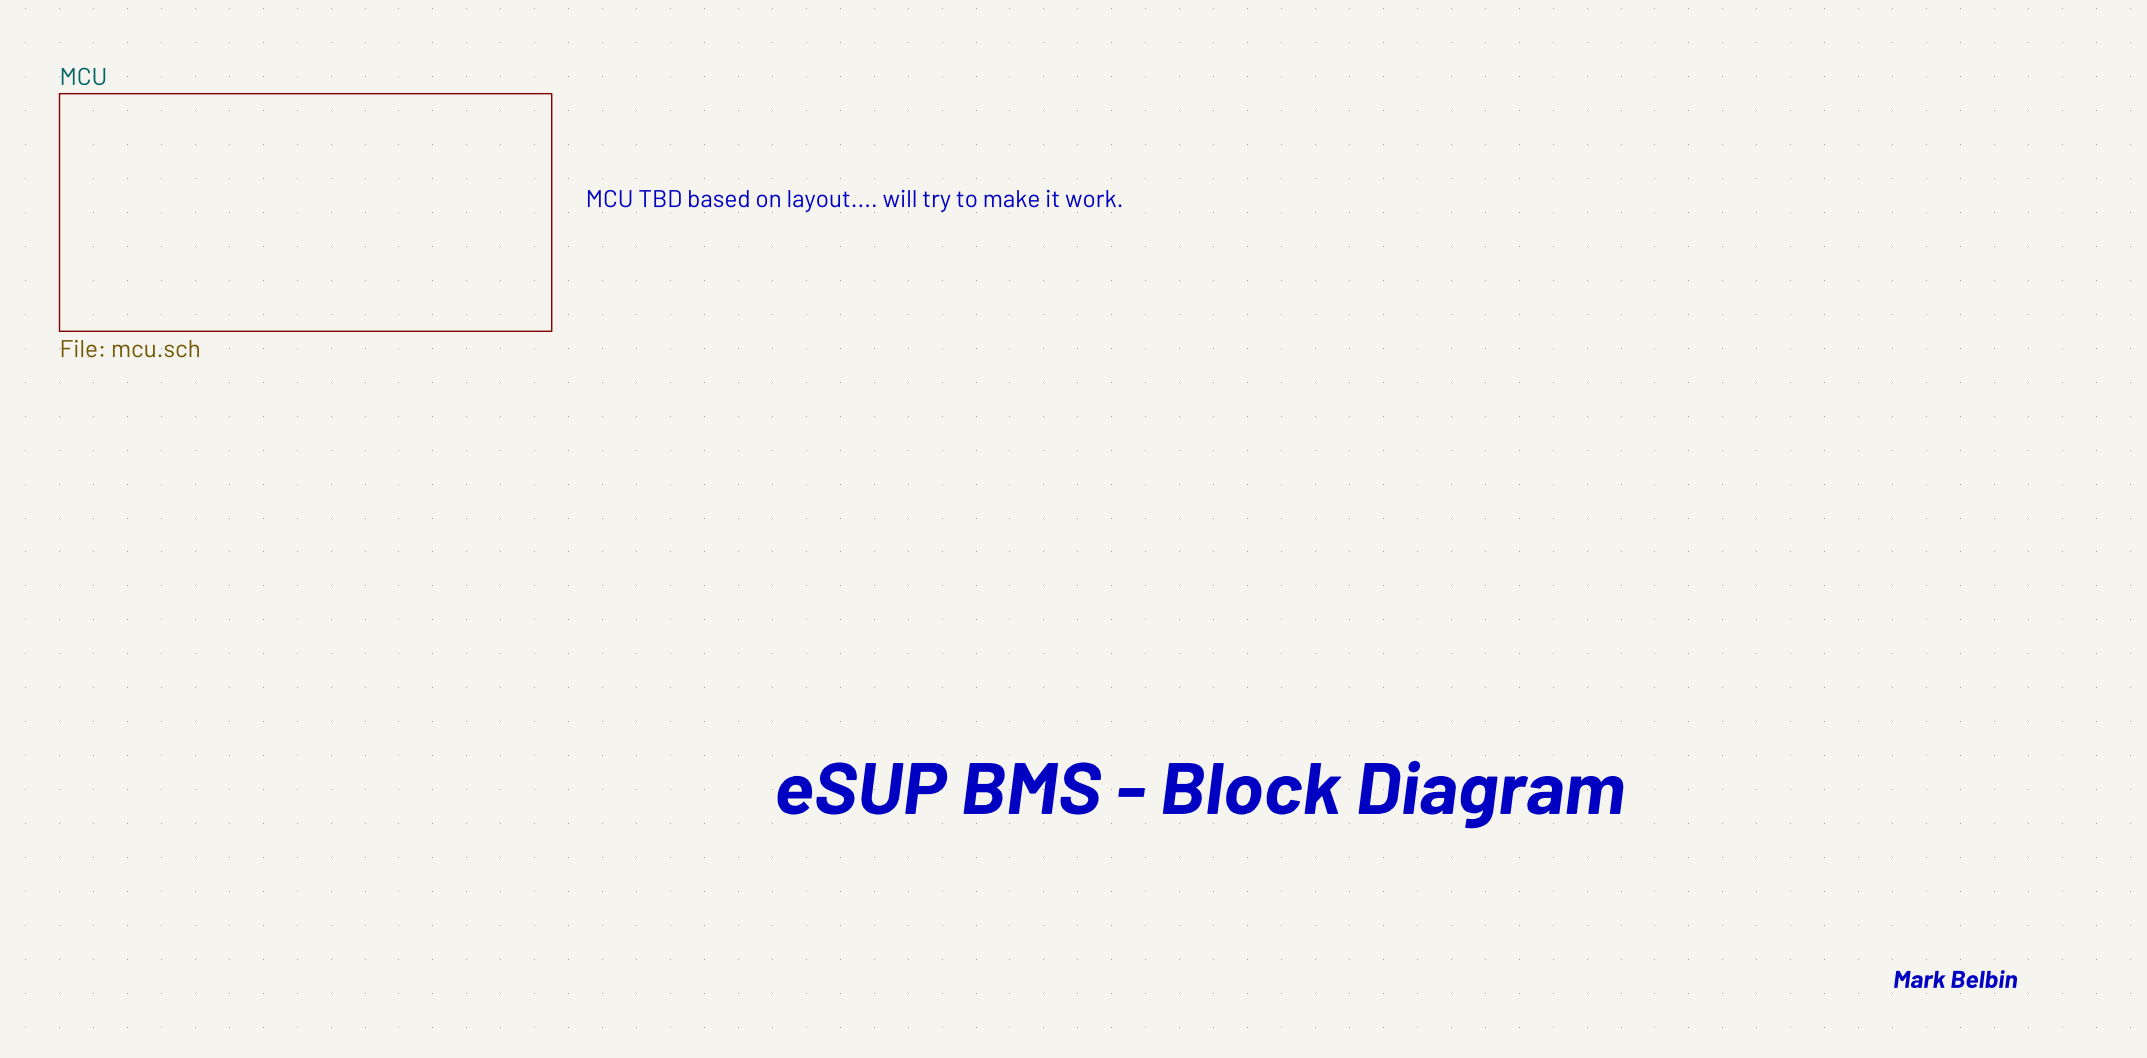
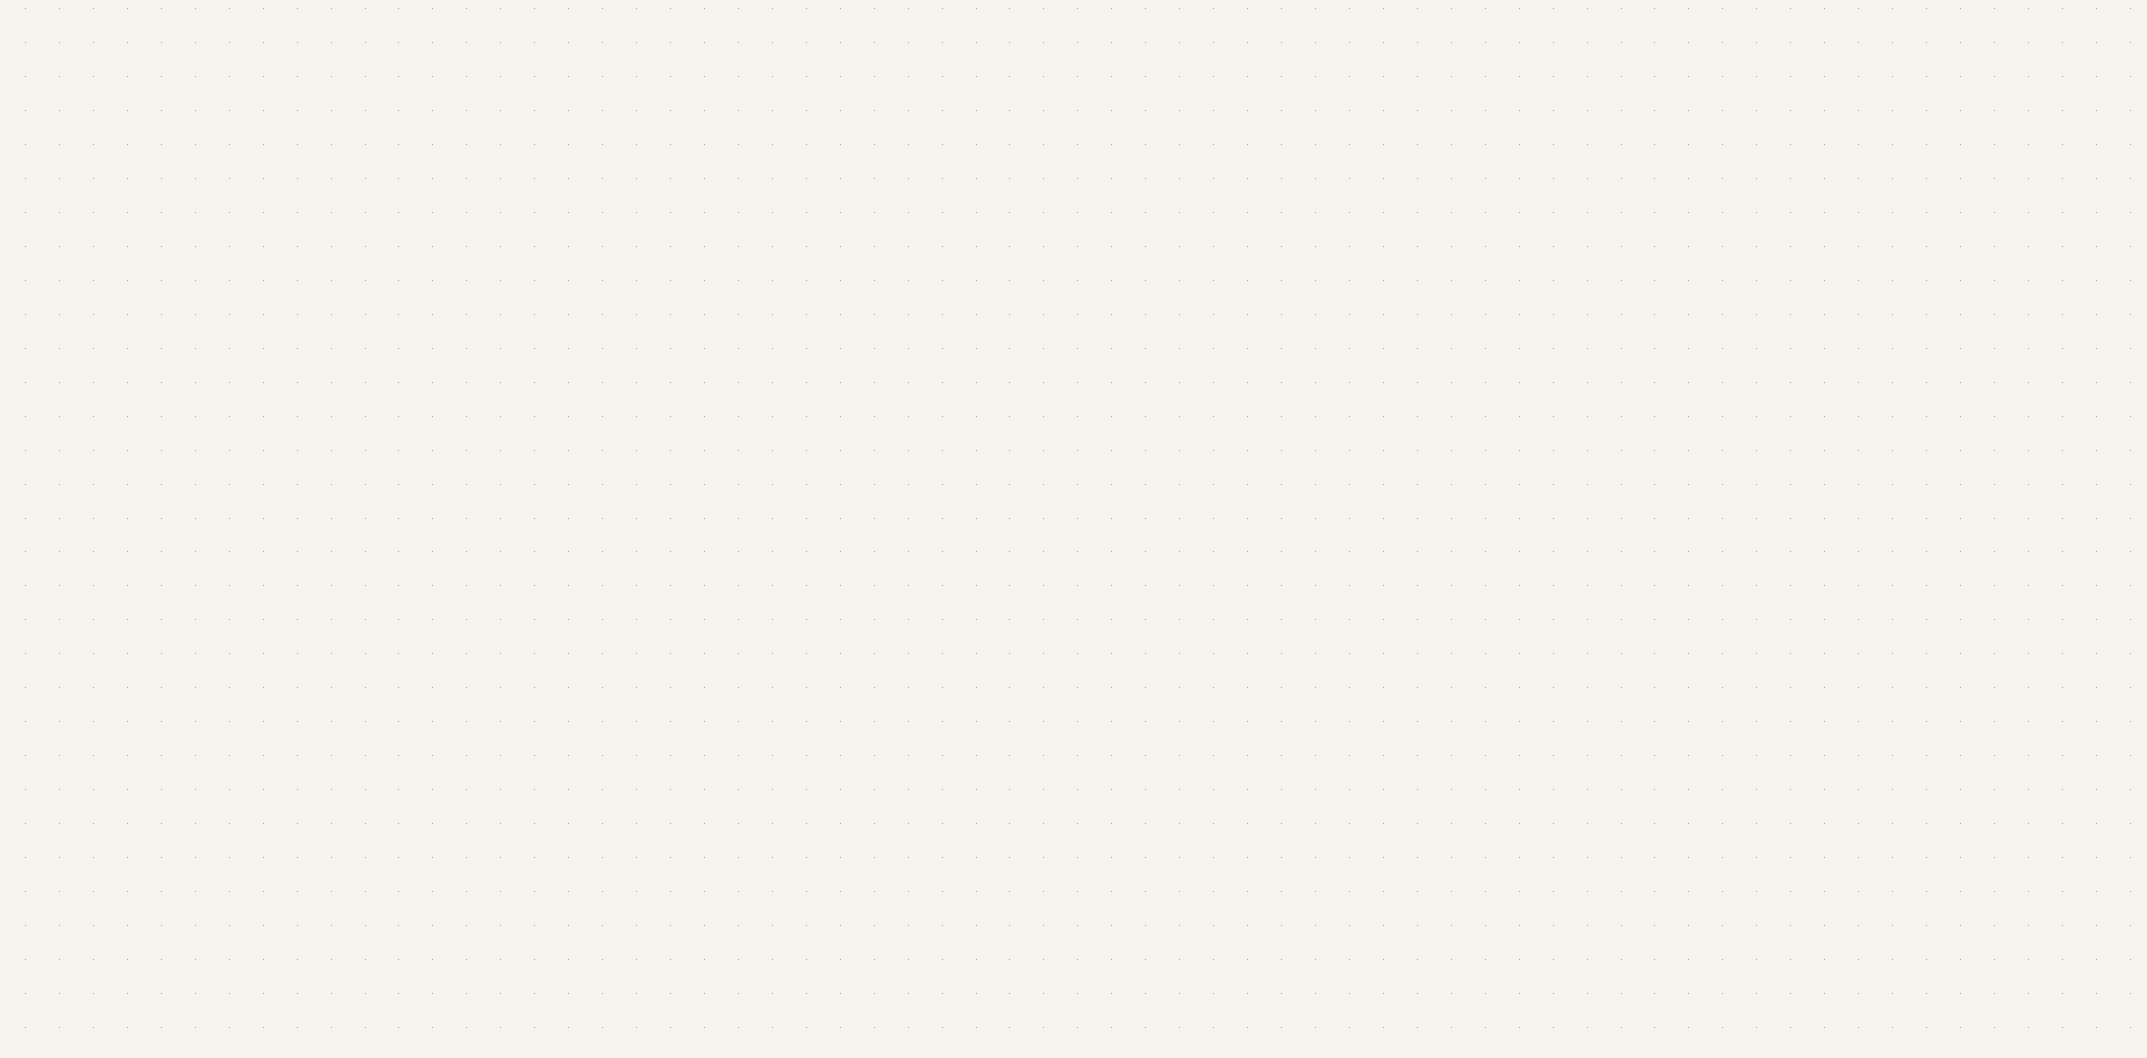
text: MCU TBD based on layout.... will try to make it work. (854, 200) -> none
sheet MCU: File: mcu.sch (305, 212) -> none
text: eSUP BMS - Block Diagram (1200, 794) -> none
text: Mark Belbin (1955, 979) -> none

